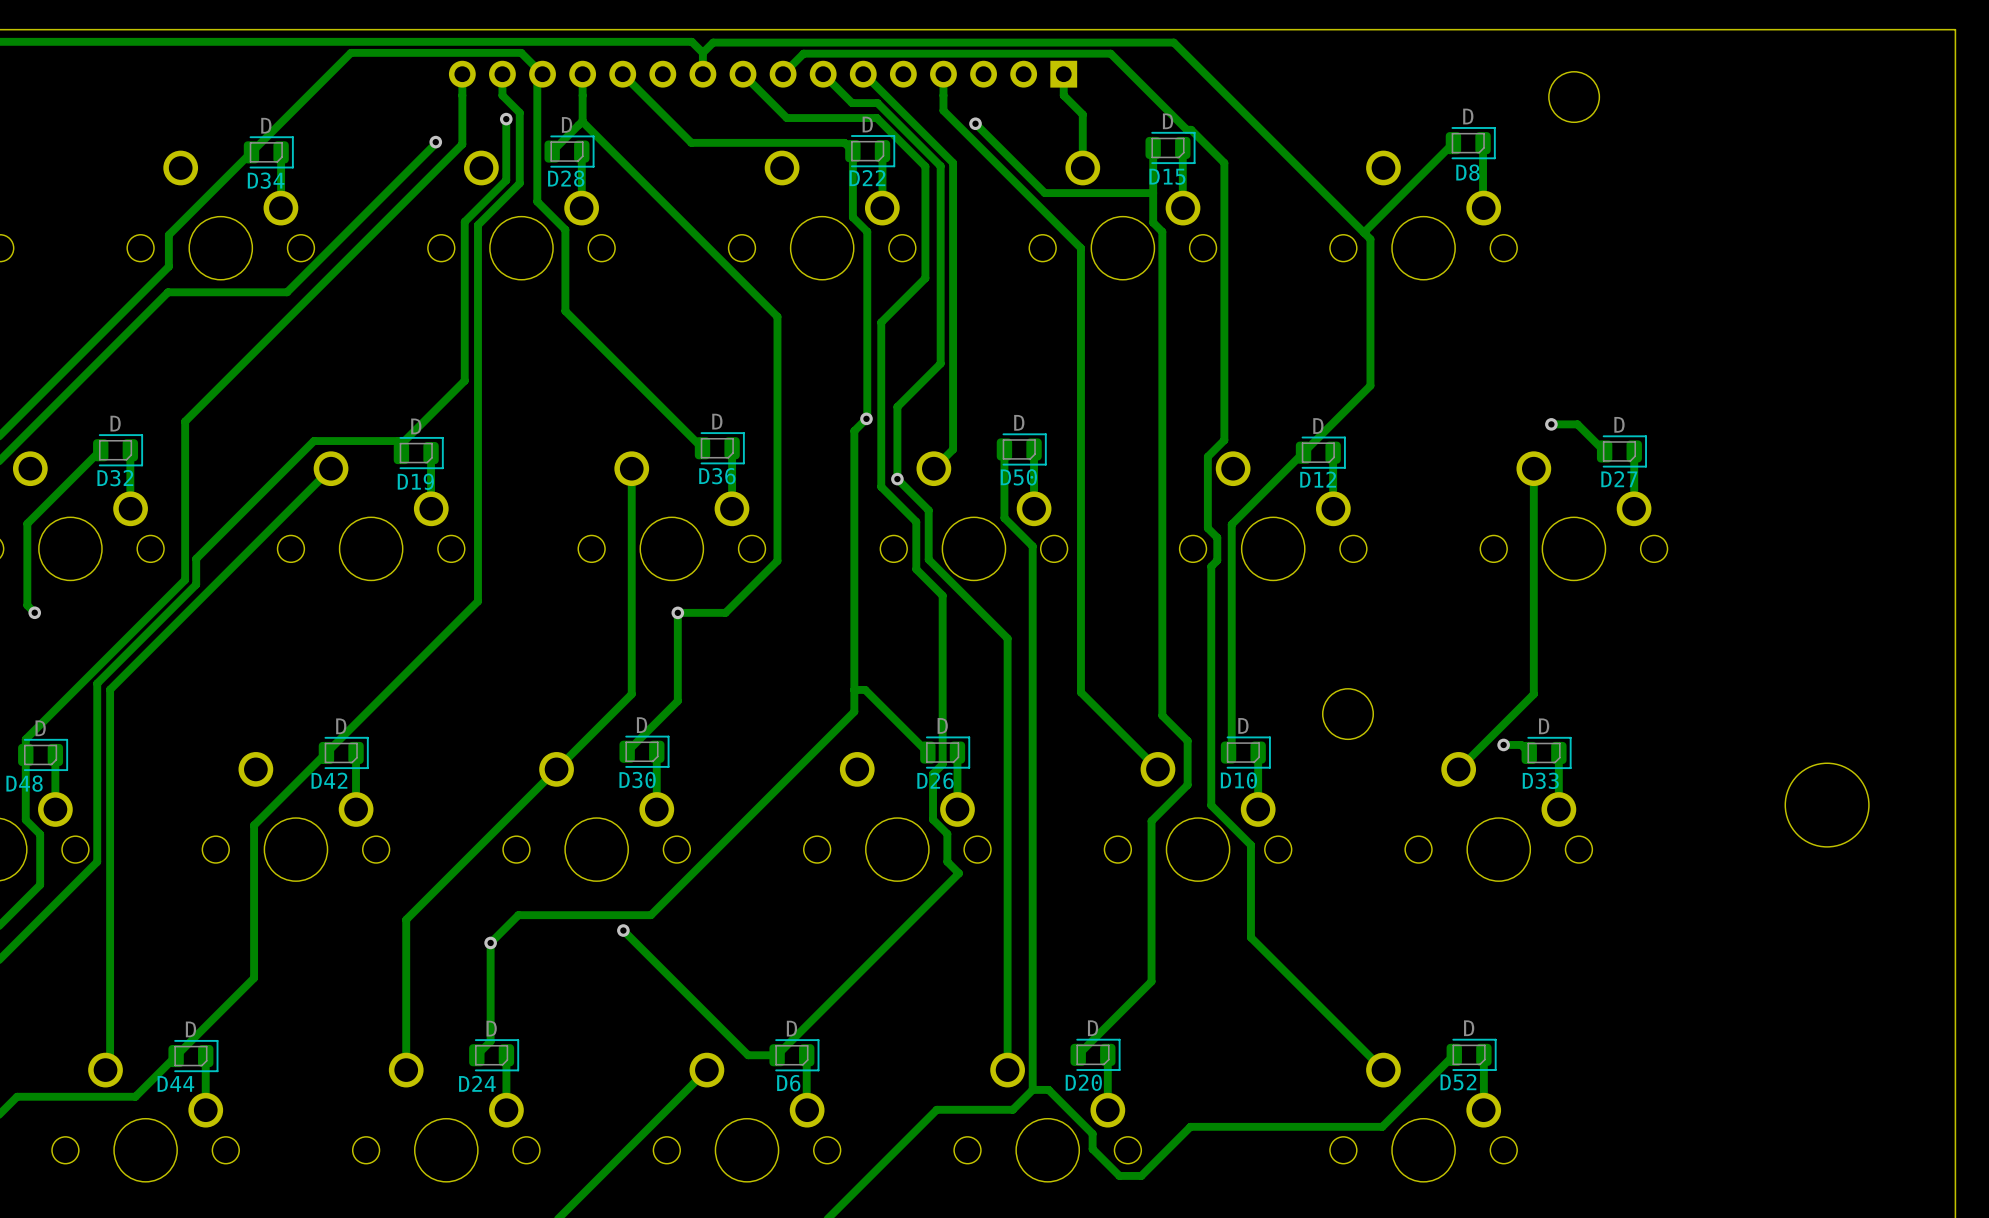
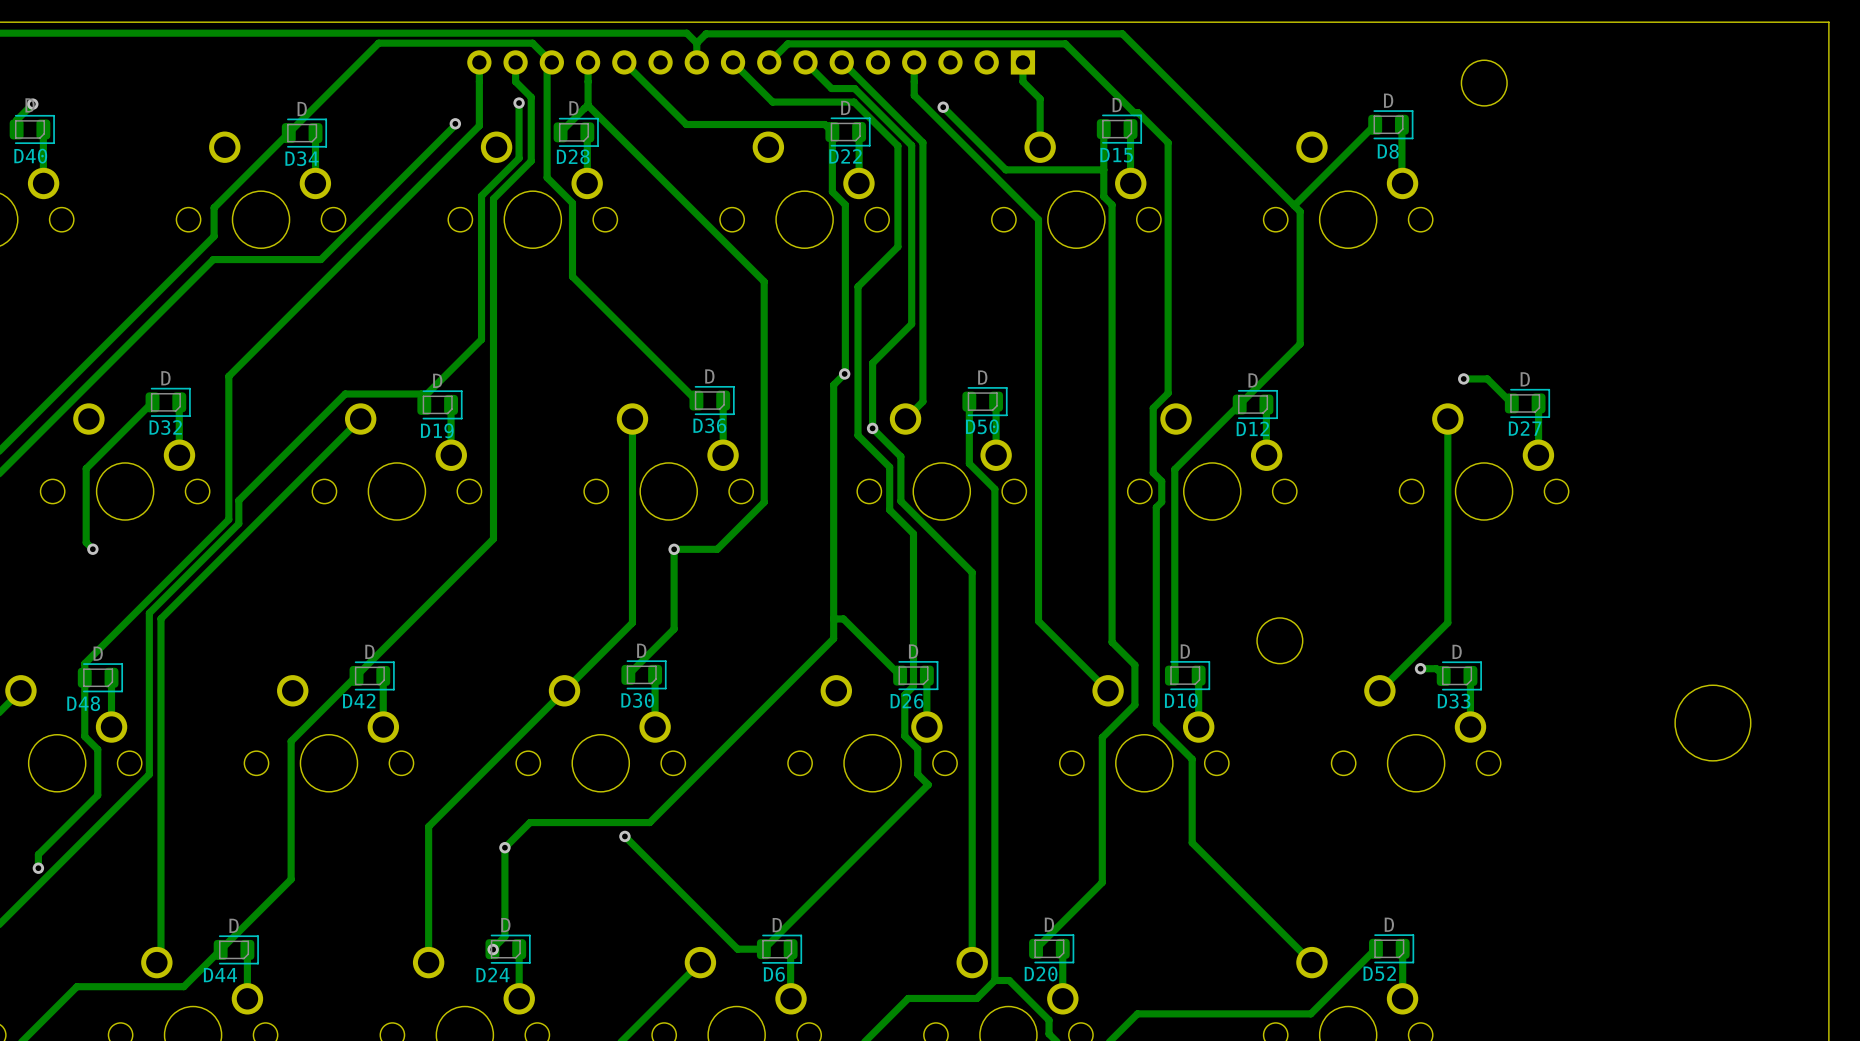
via: none -> (493, 949)

